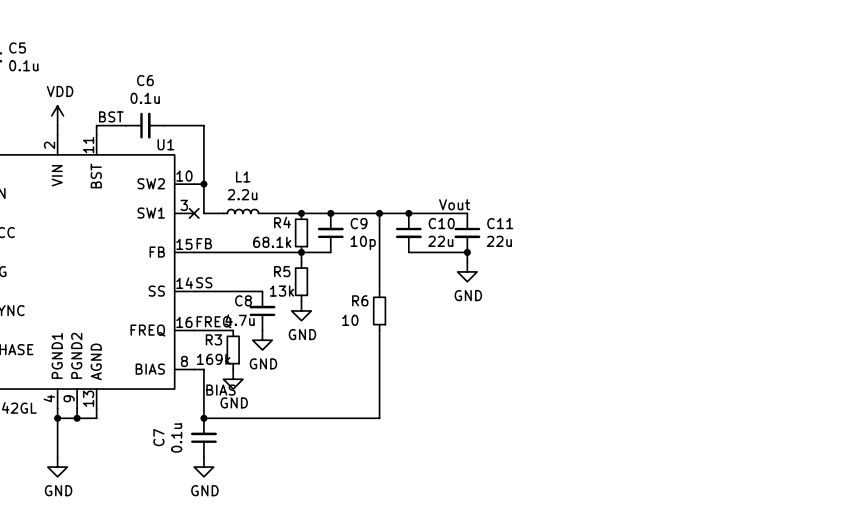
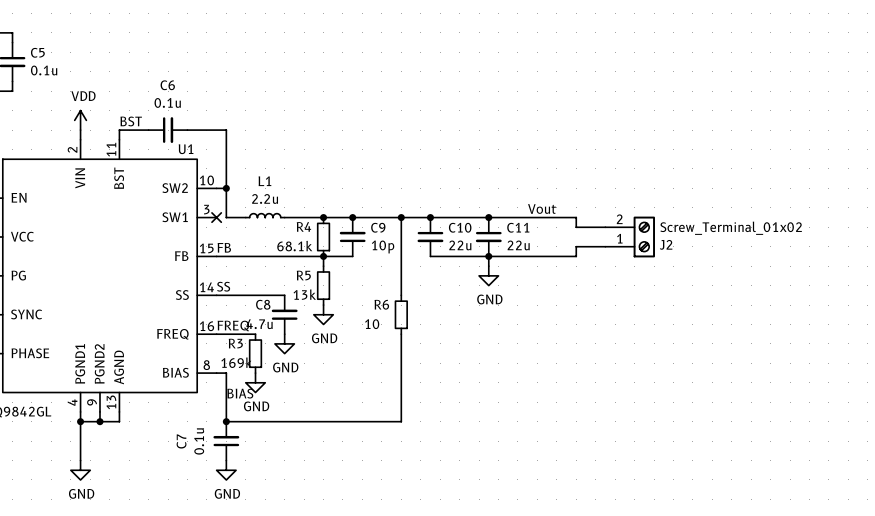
label position: Vout (454, 204) -> Vout (542, 208)
wire: none -> (488, 217) (576, 217) (576, 227) (605, 227)
junction: none -> (488, 217)
J2: none -> Screw_Terminal_01x02 (630, 237)
wire: none -> (605, 246) (576, 246) (576, 256) (488, 256)

